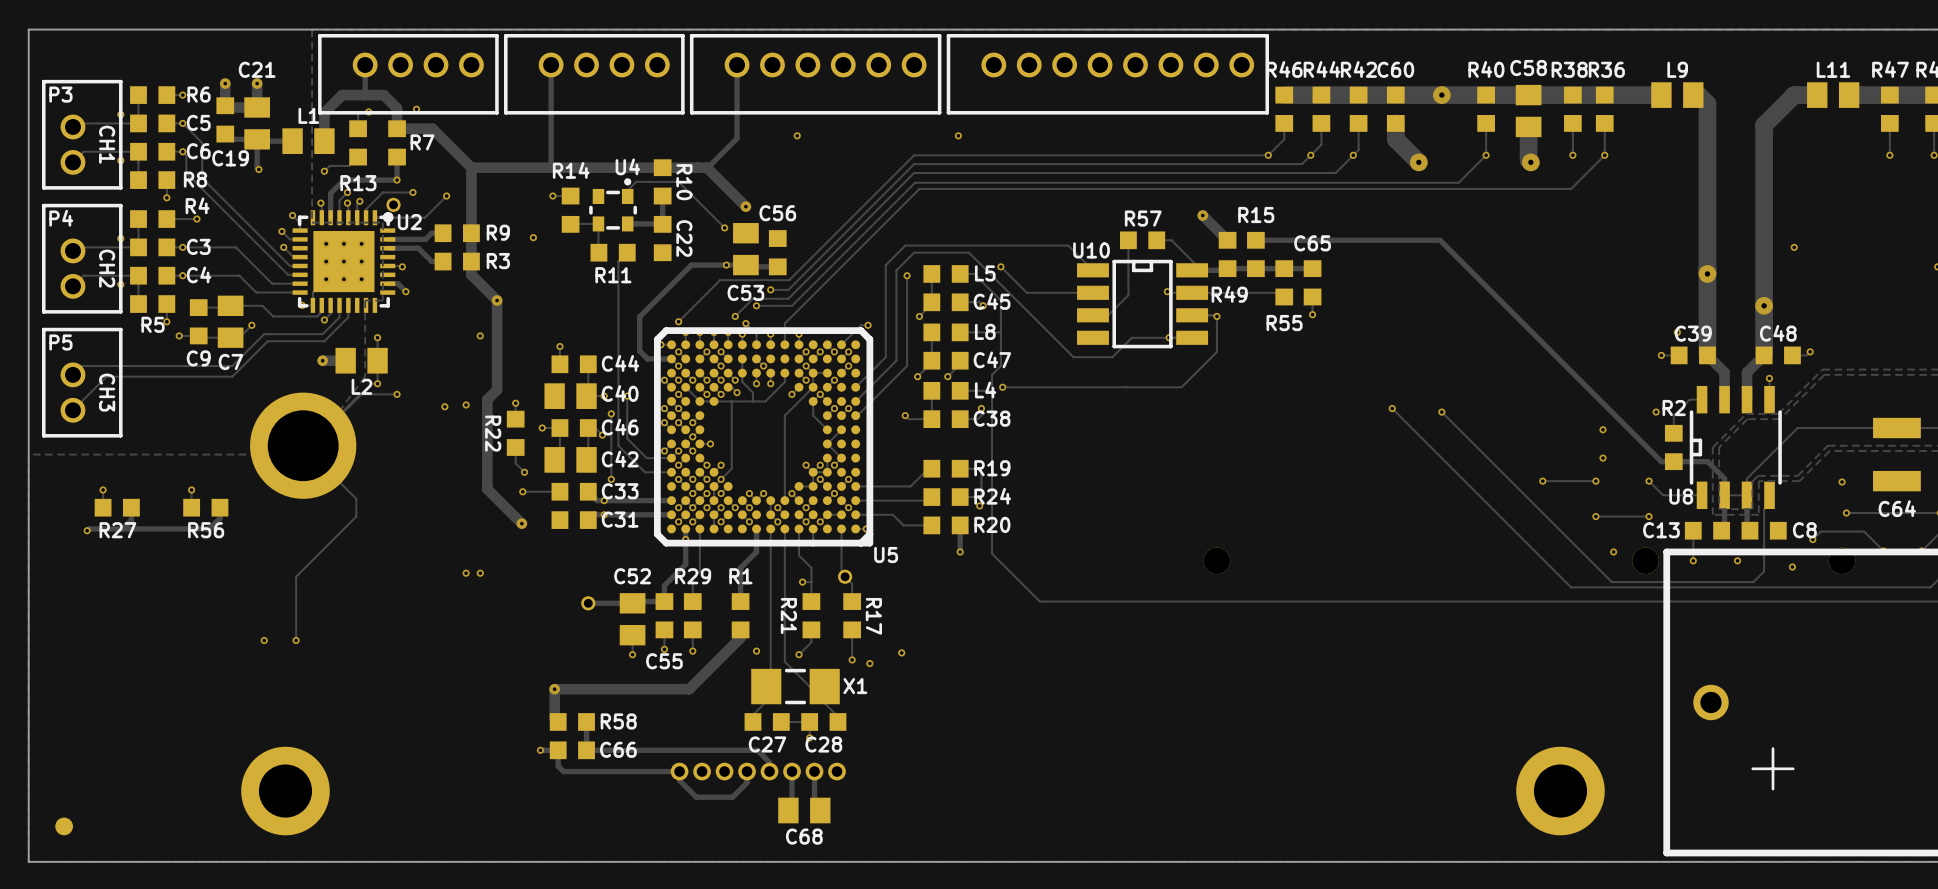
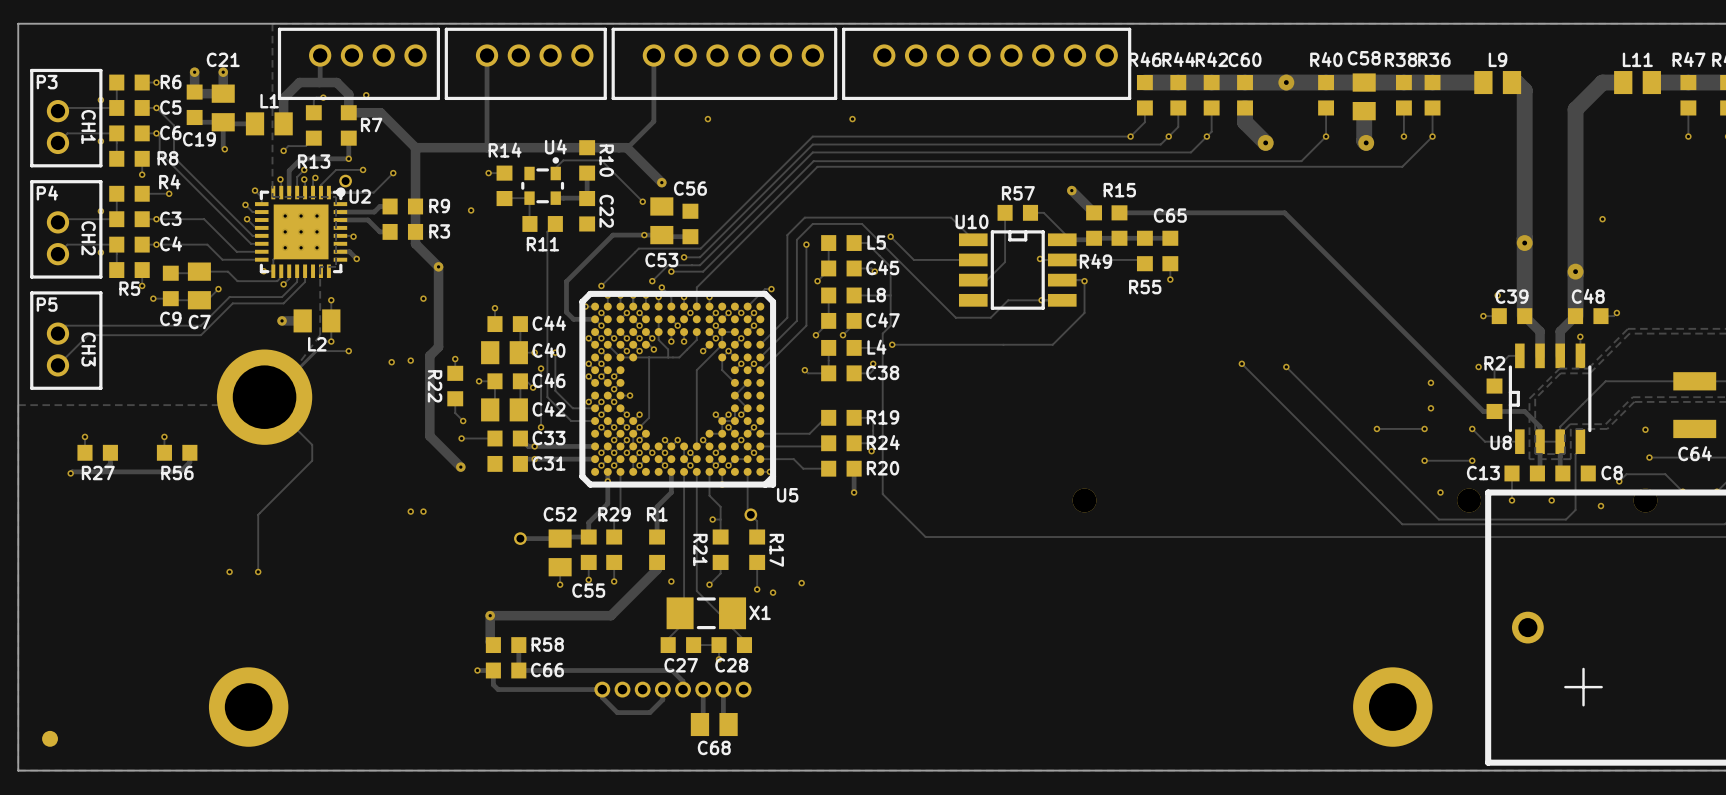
via: none -> (690, 312)

